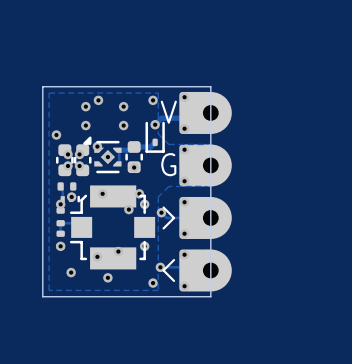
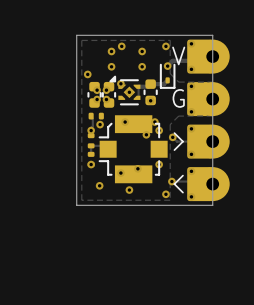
part: (70, 199) -> none

